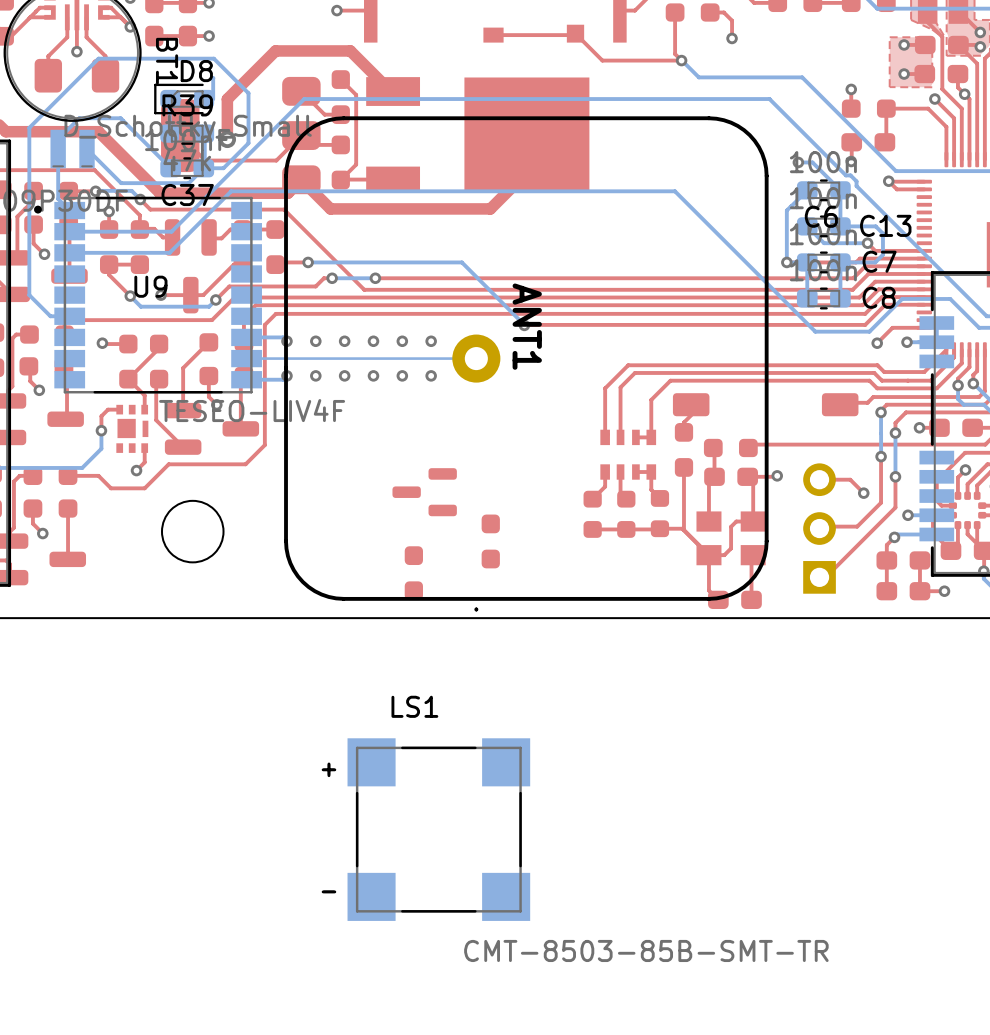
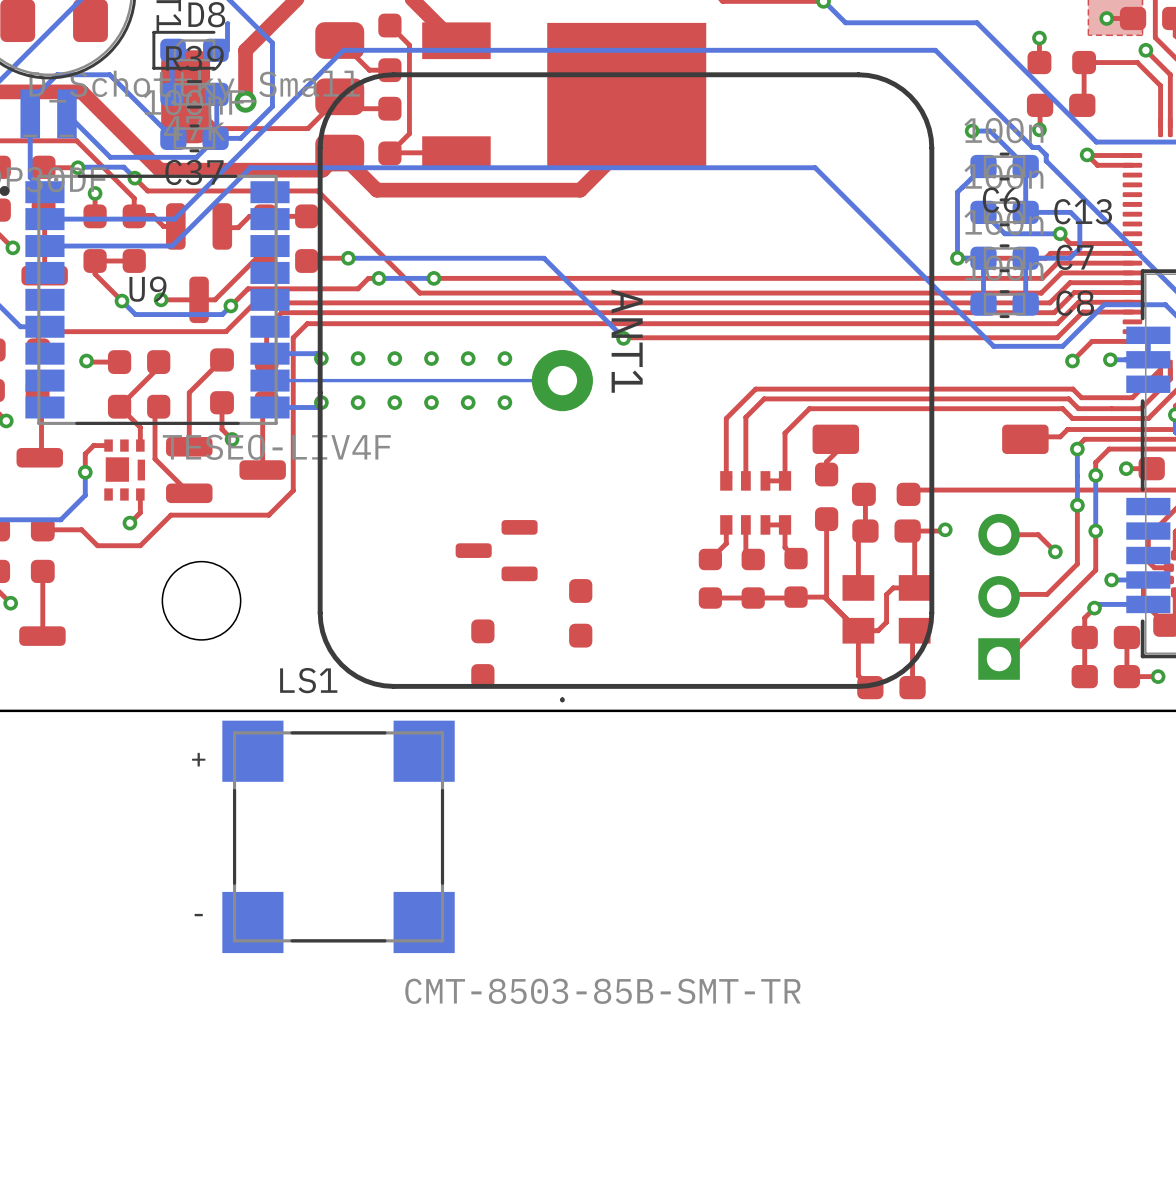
LS1 position: (438, 829) -> (338, 836)

